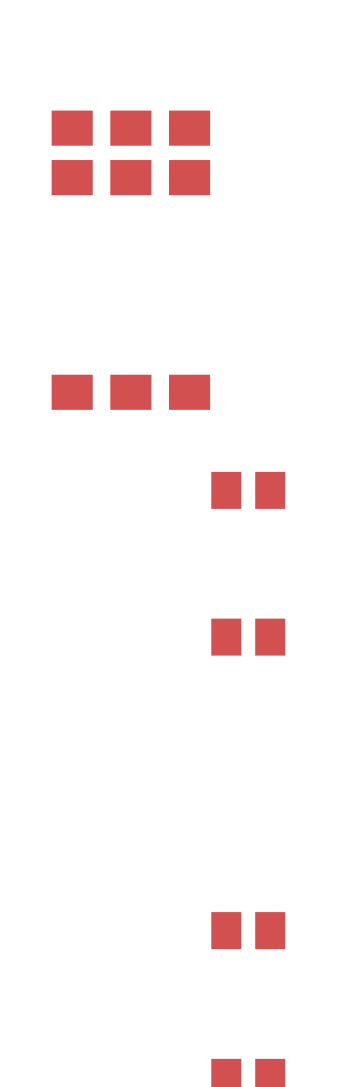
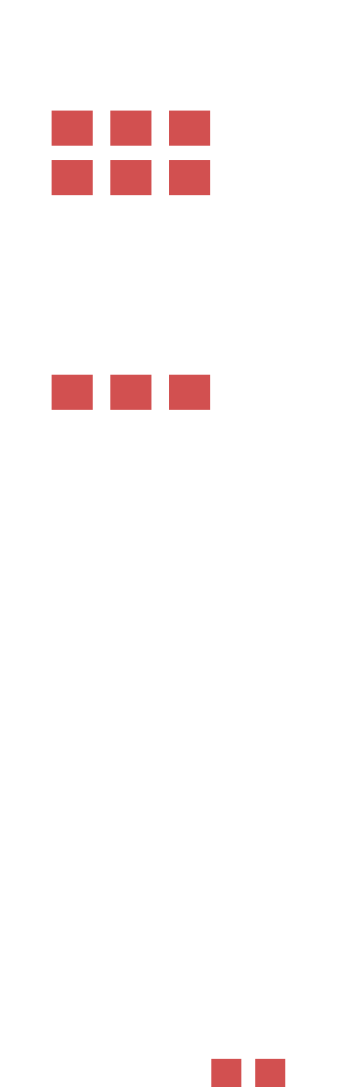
part: (248, 490) -> none
part: (248, 637) -> none
part: (248, 930) -> none

